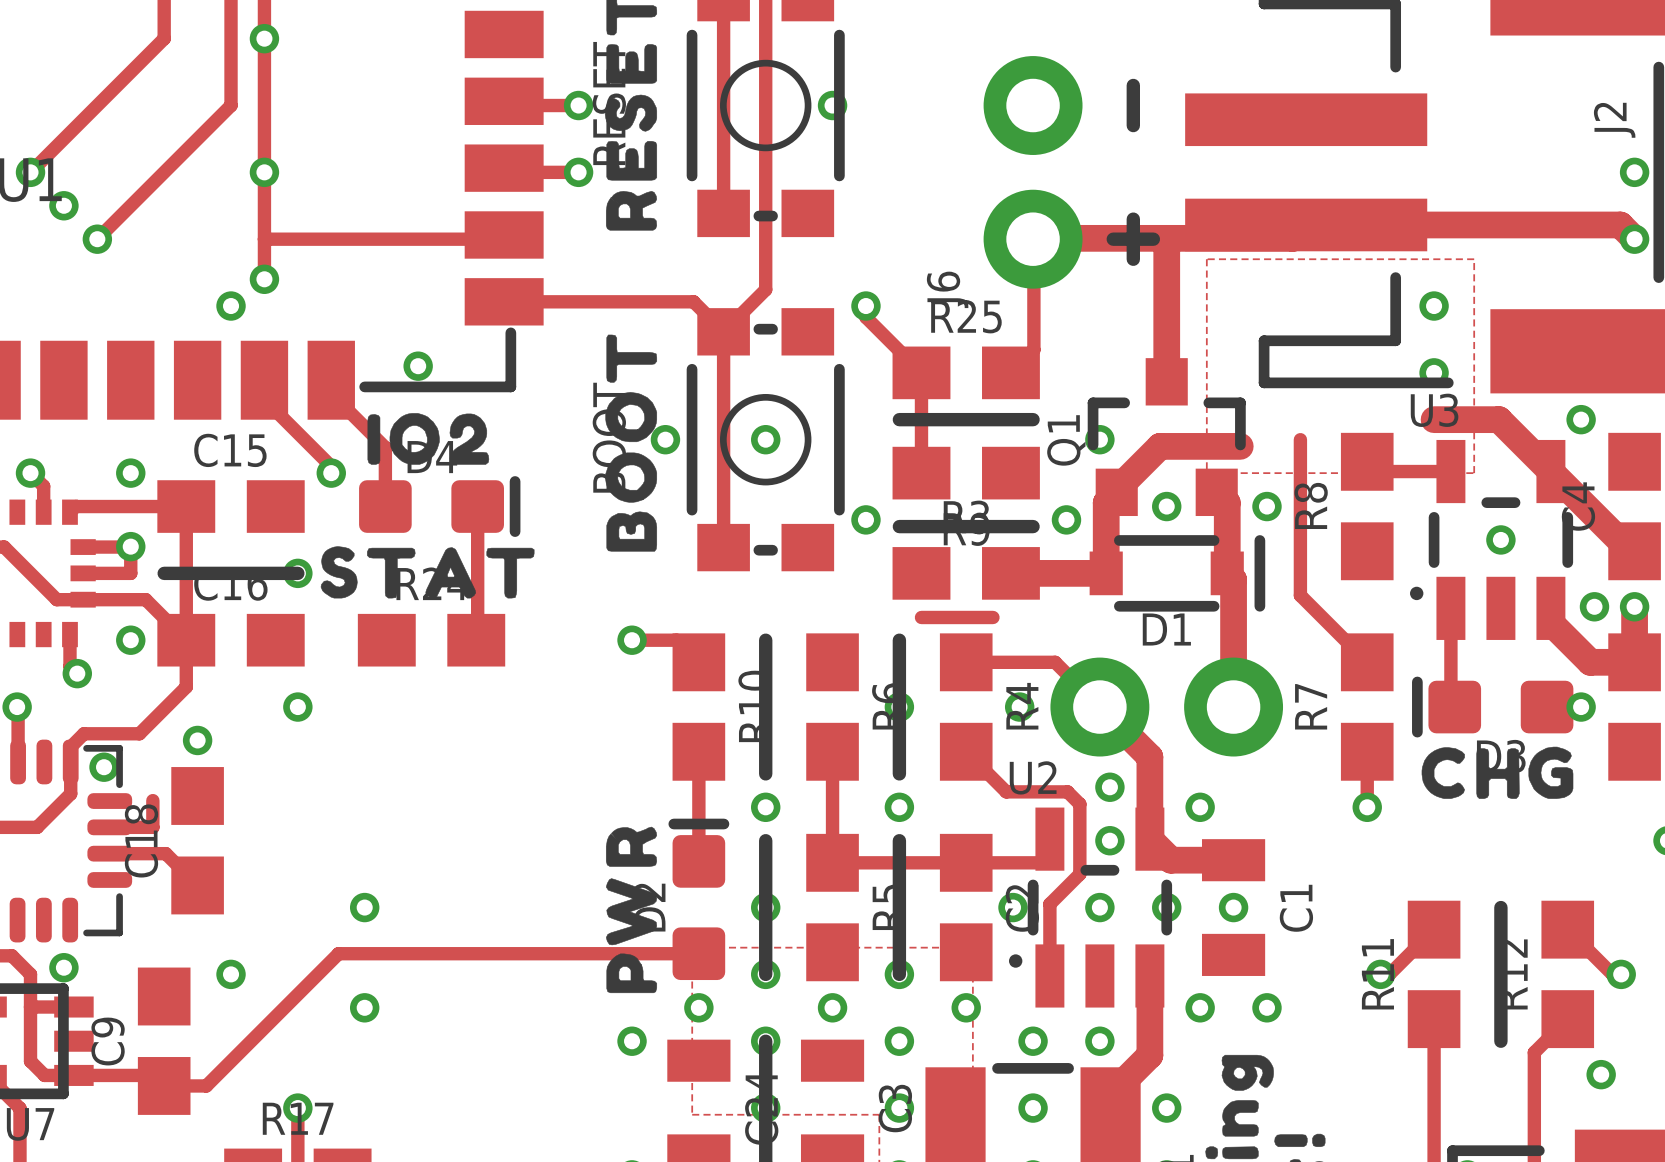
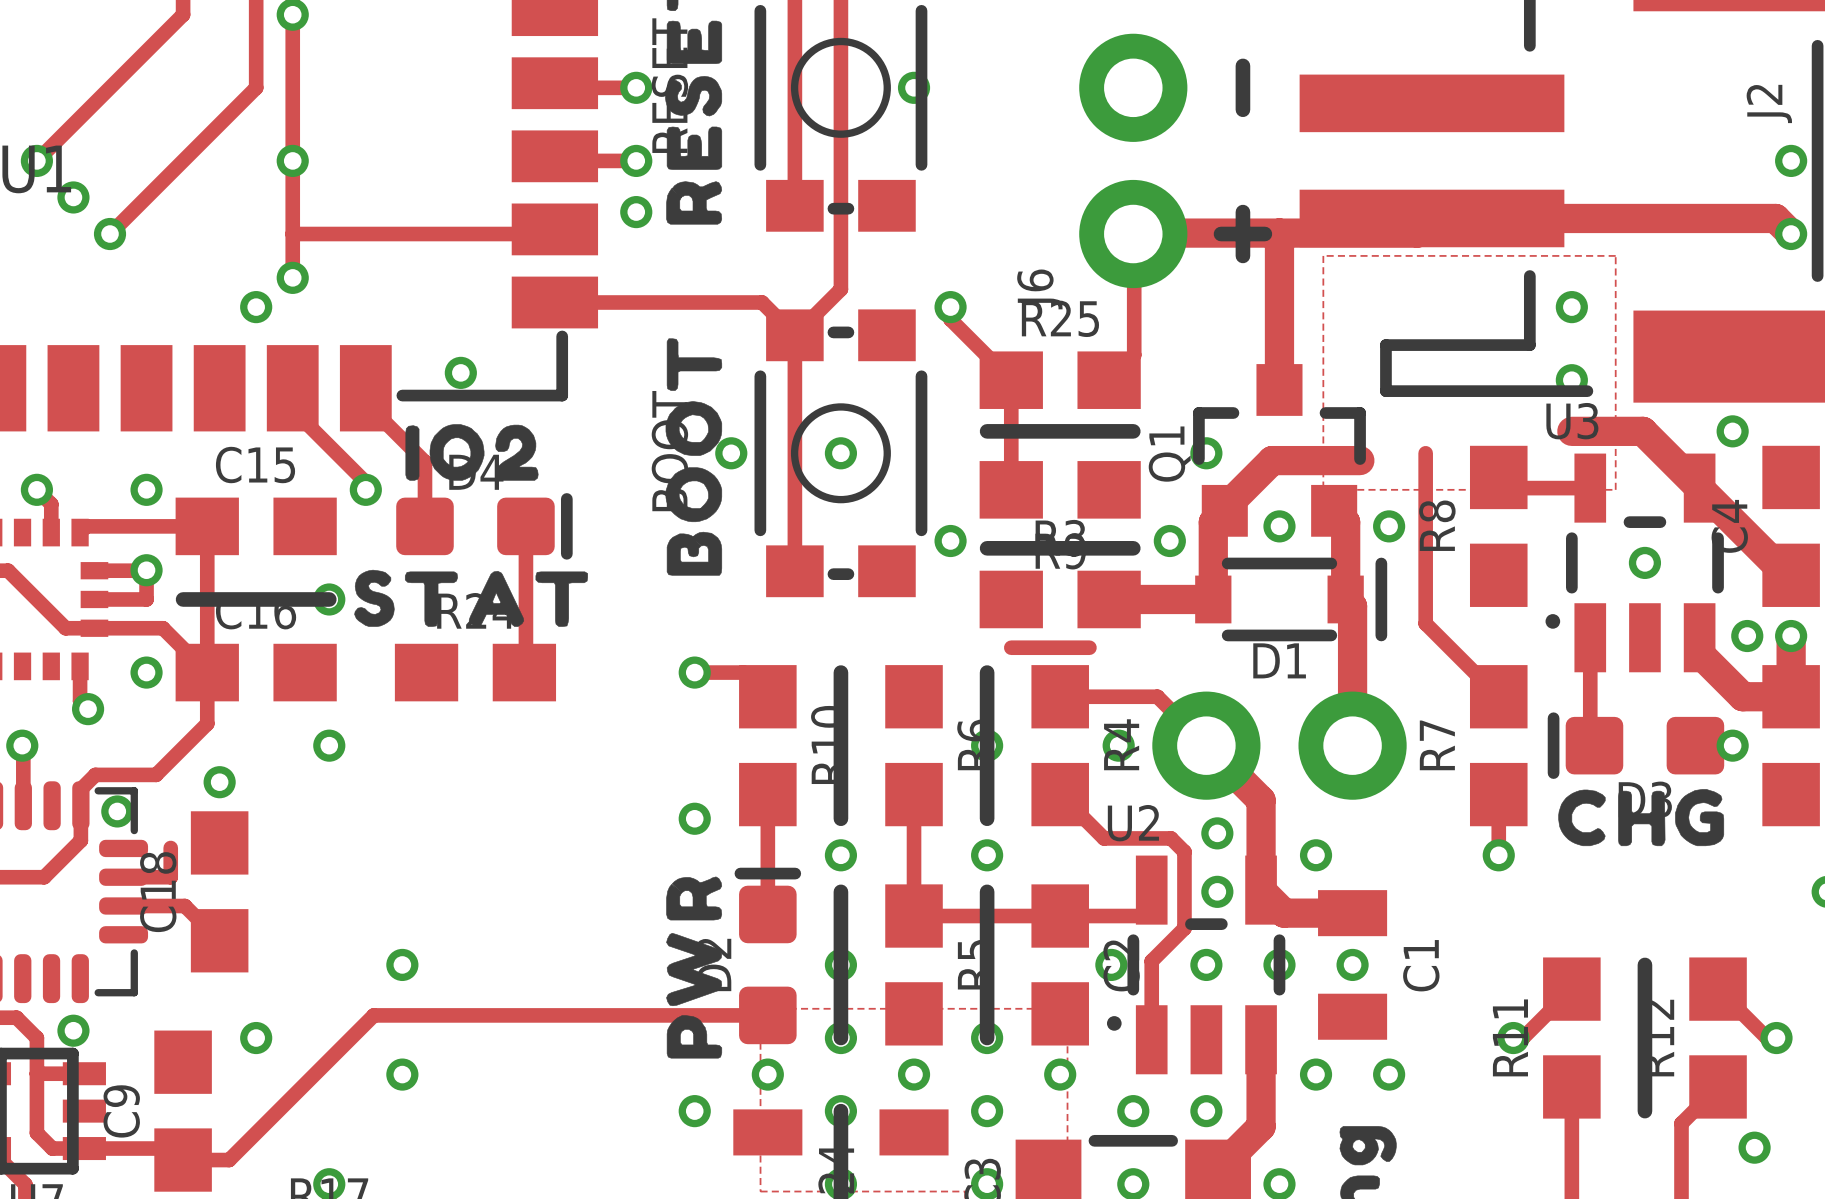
via: none -> (636, 212)
via: none -> (694, 818)

